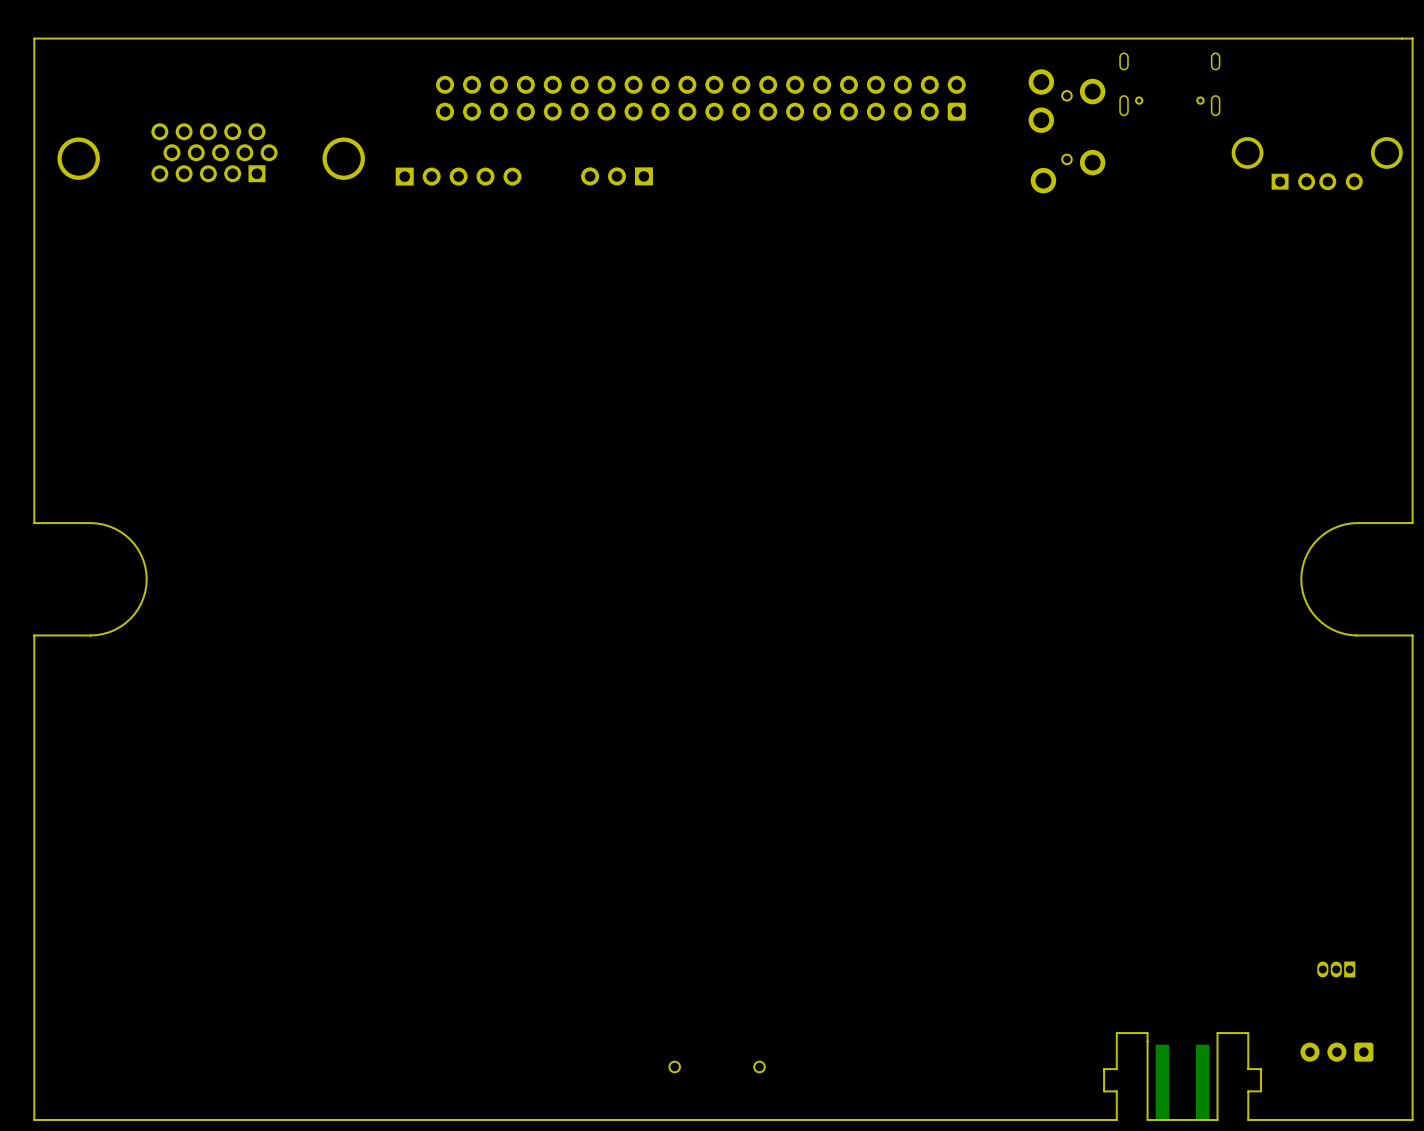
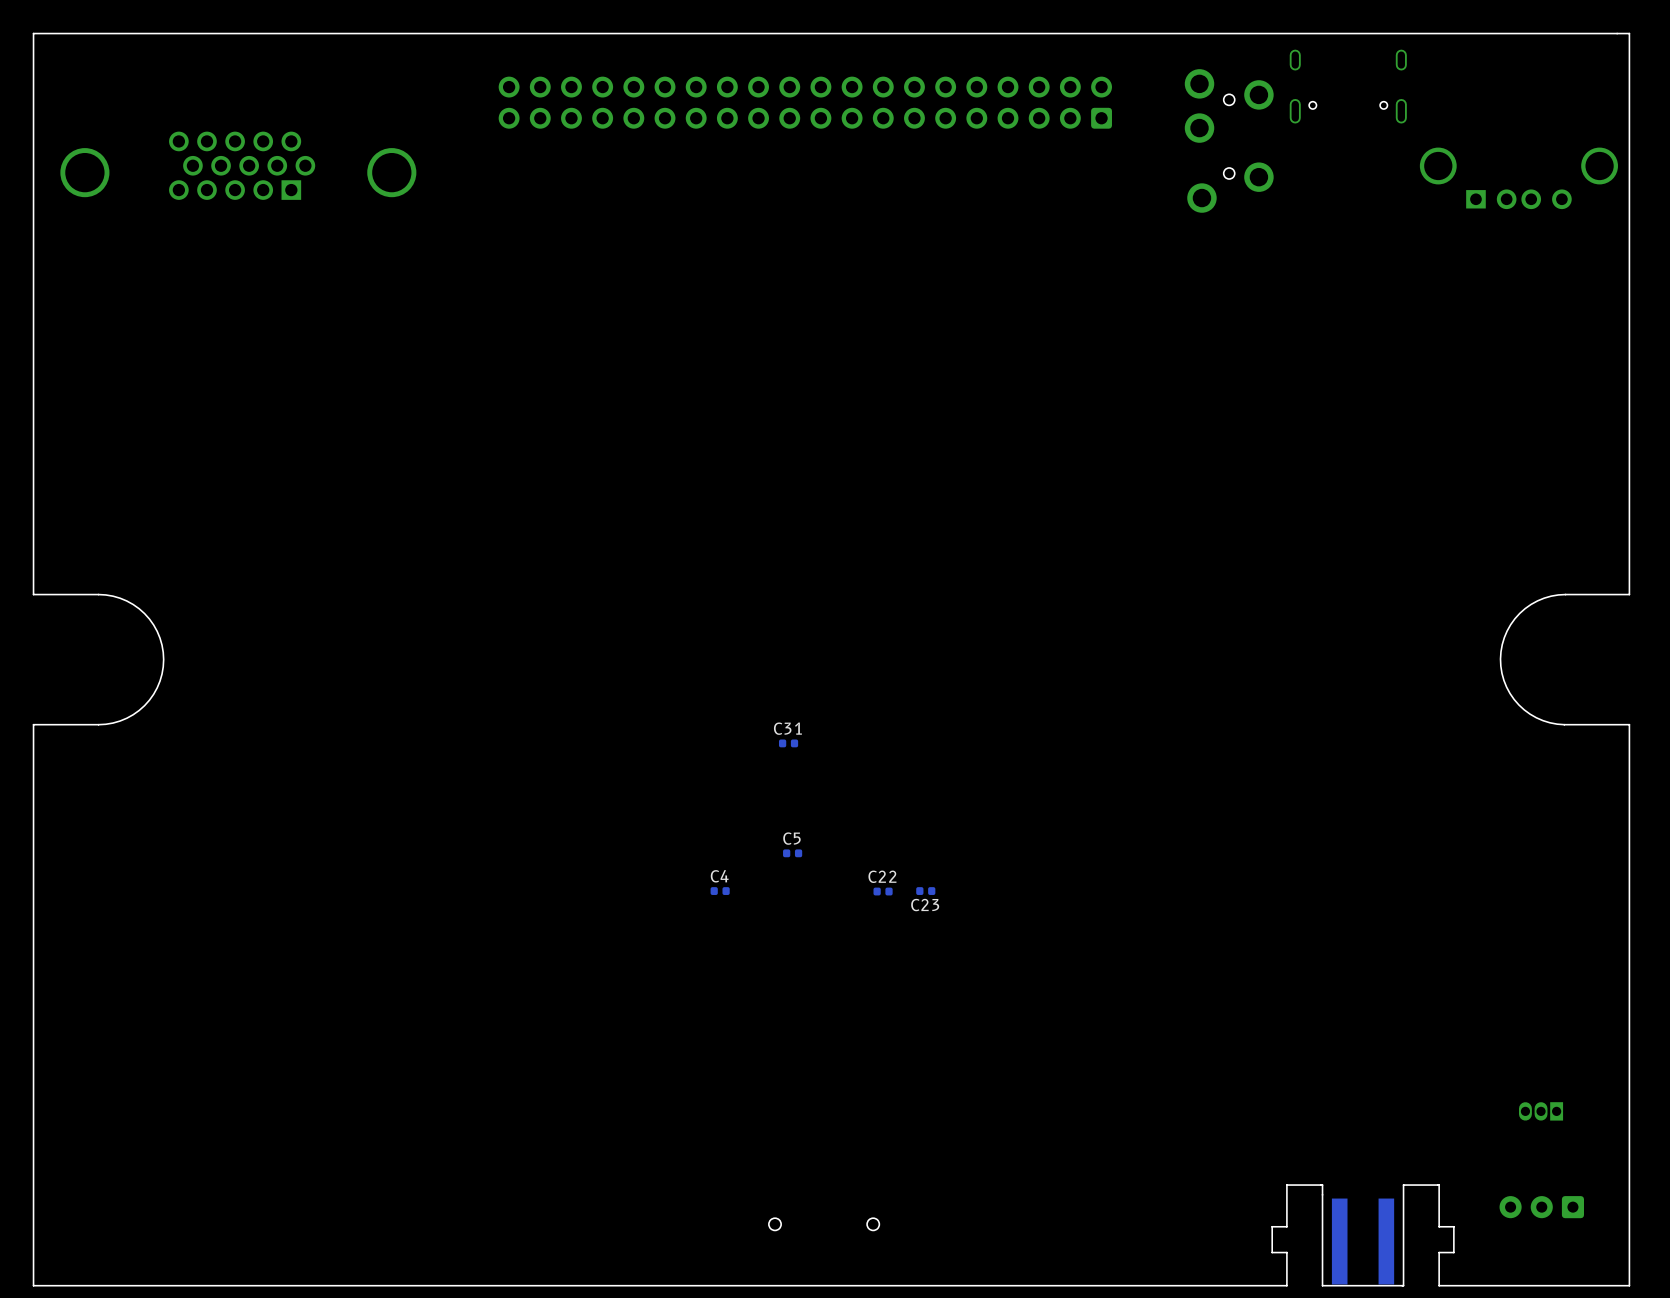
part: (458, 176) -> none
part: (617, 176) -> none
C31: none -> (788, 743)
C5: none -> (792, 853)
C4: none -> (720, 891)
C22: none -> (883, 891)
C23: none -> (925, 891)

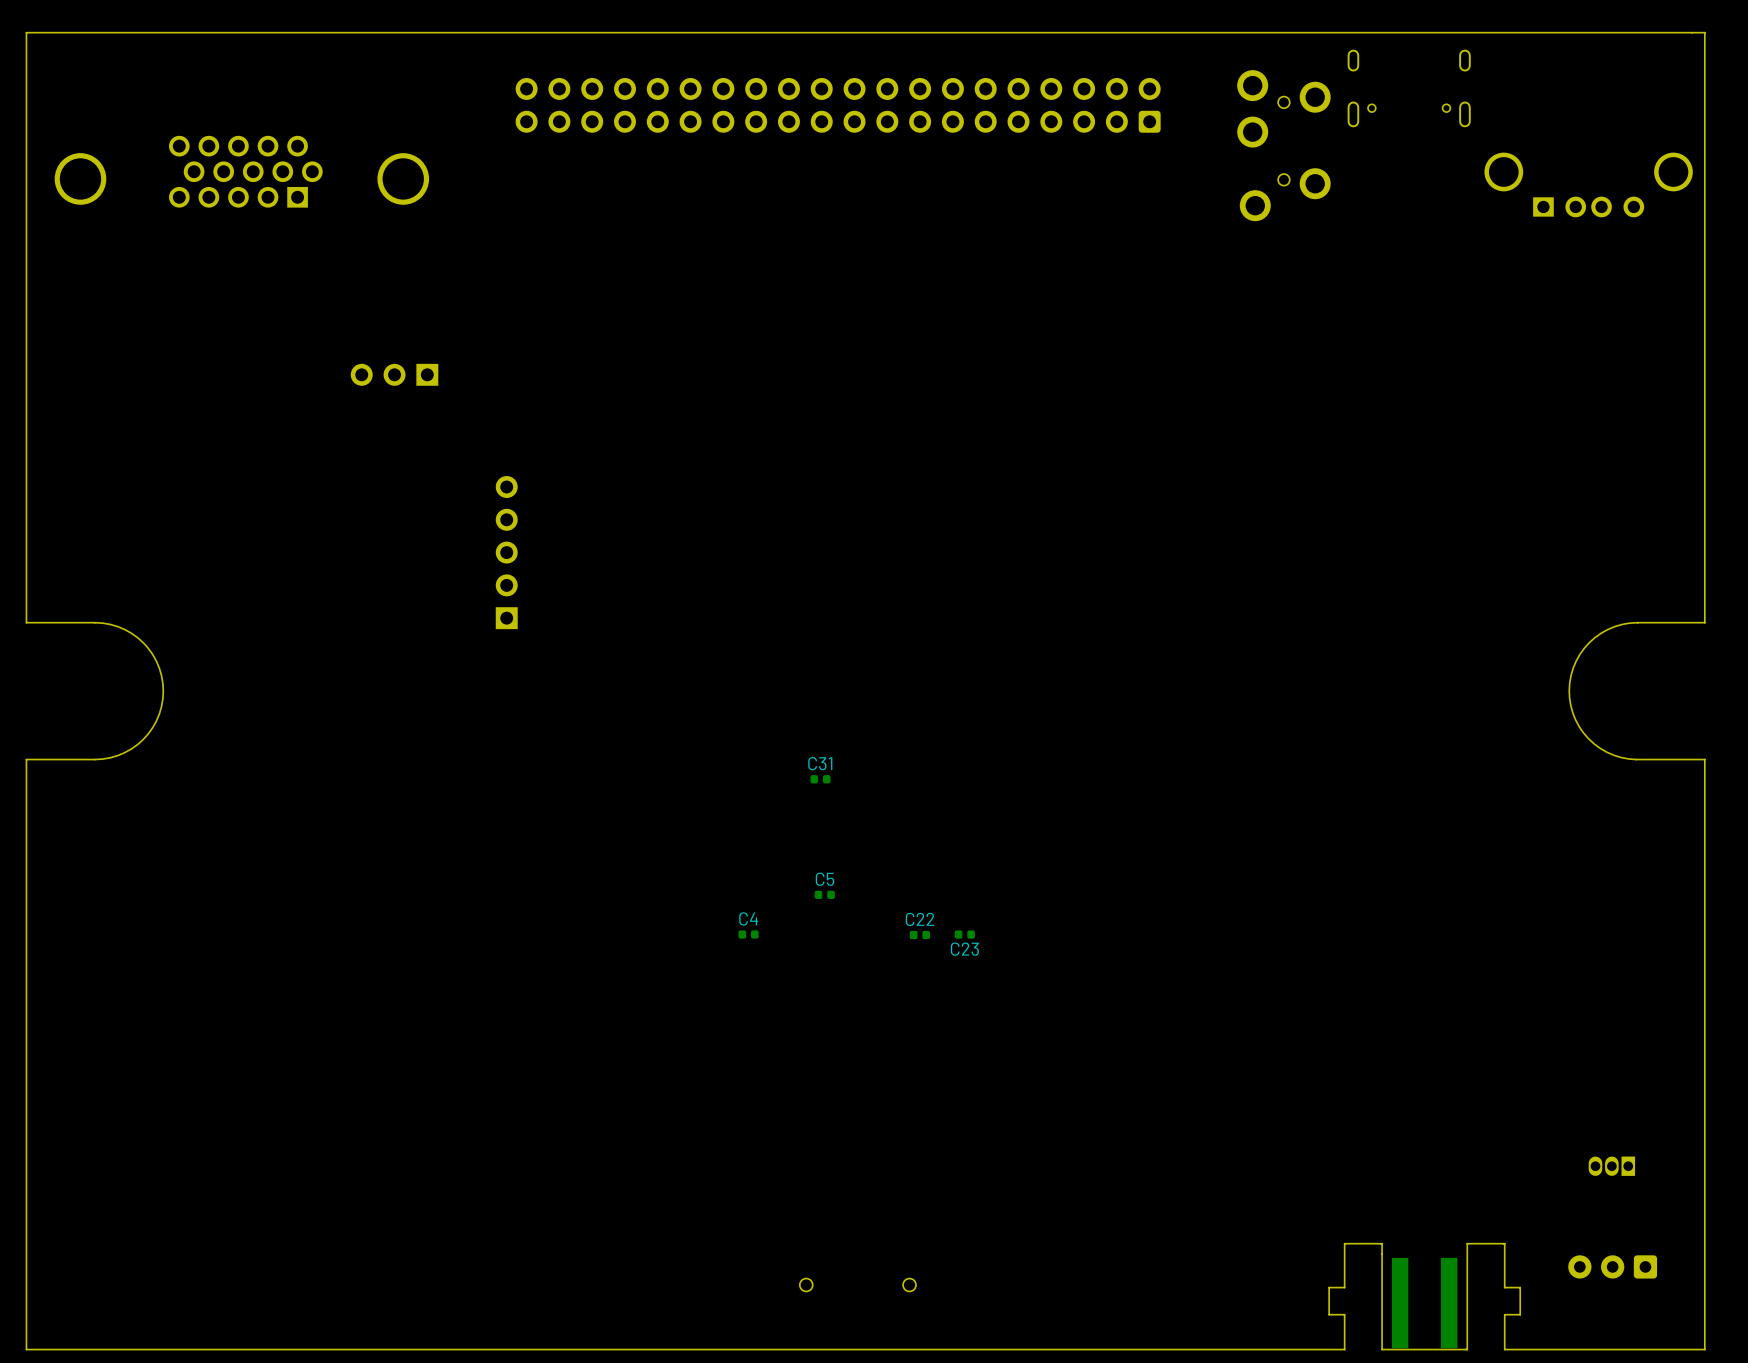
part: none -> (394, 374)
part: none -> (506, 552)

